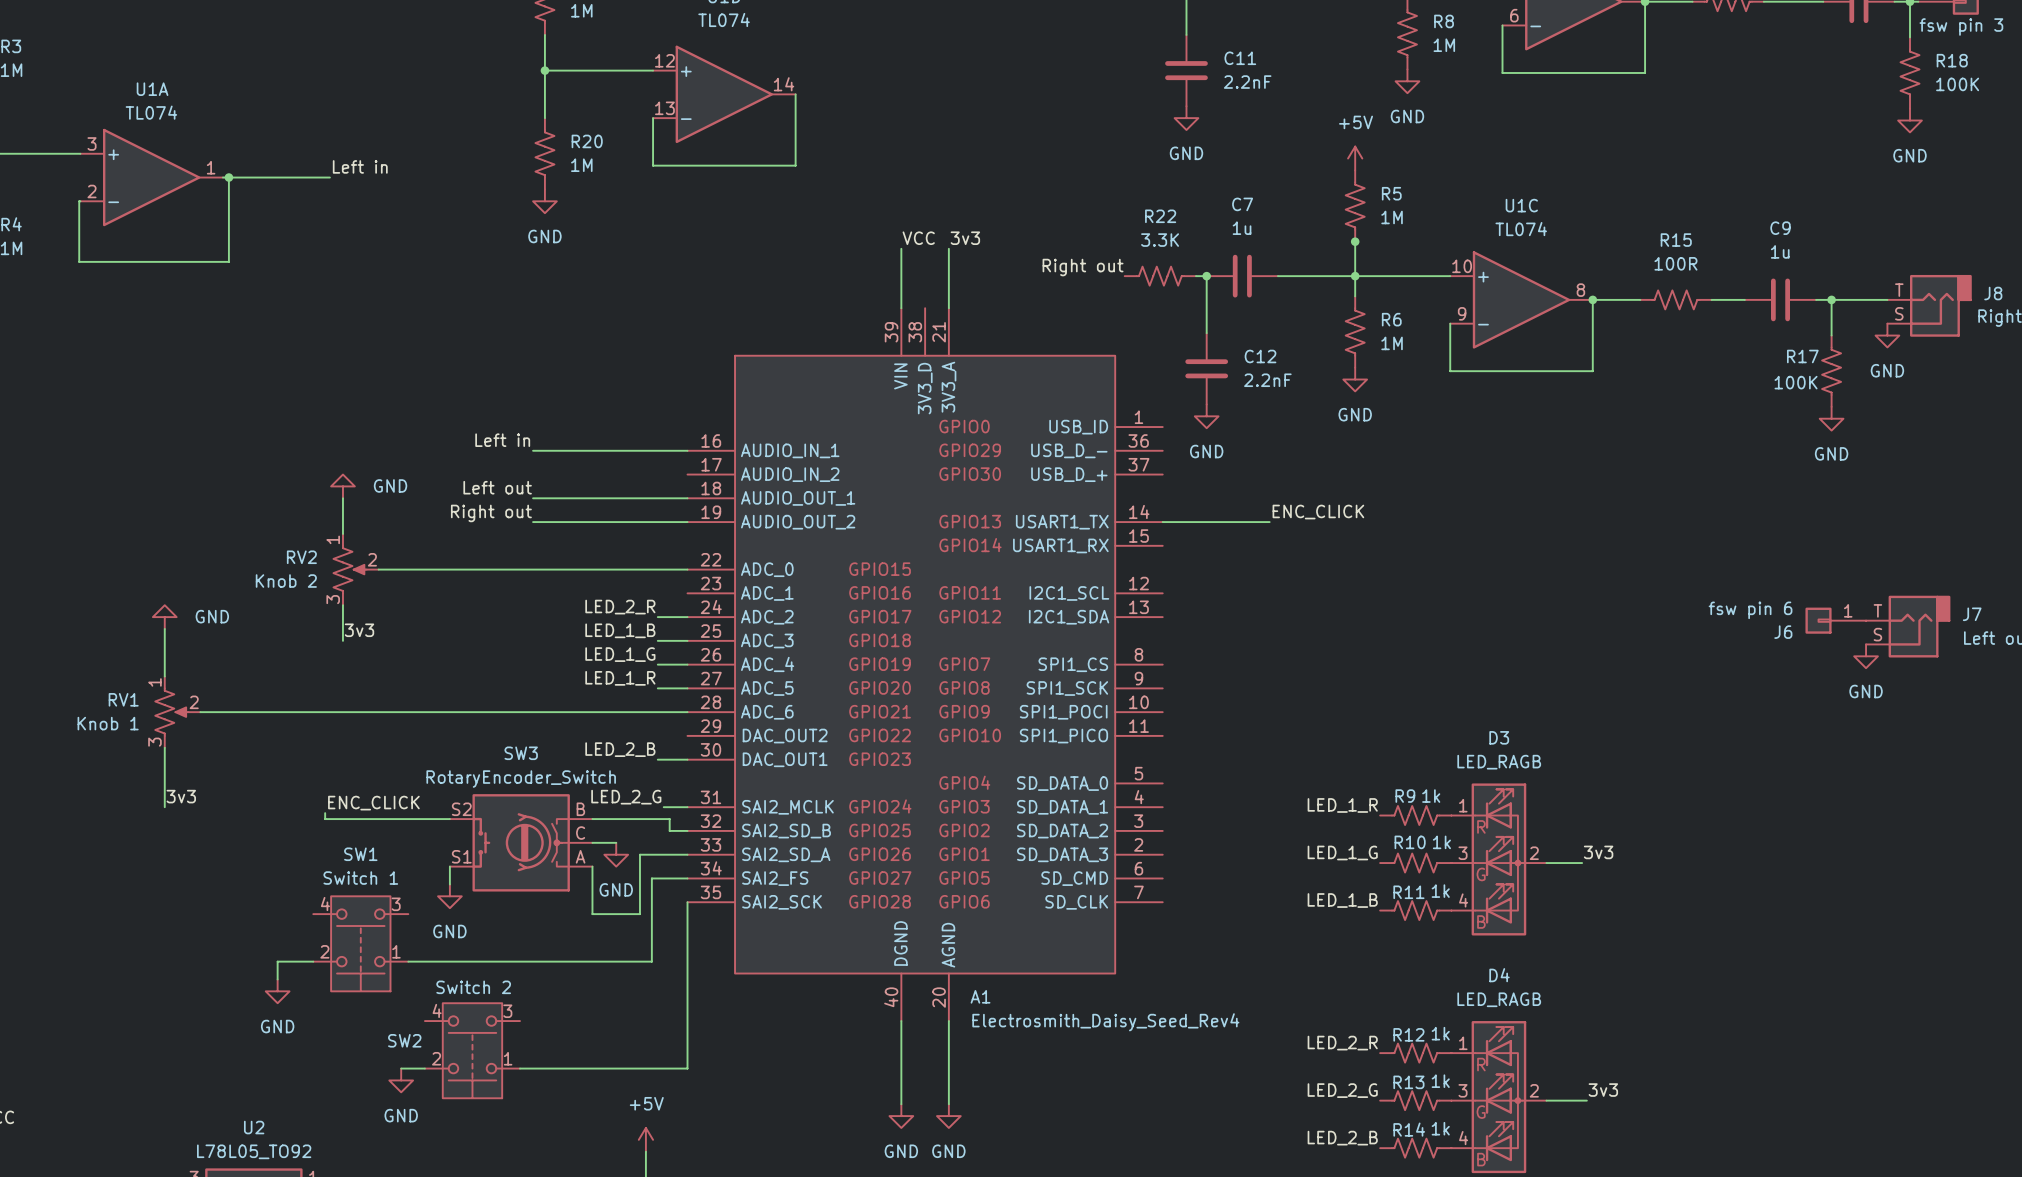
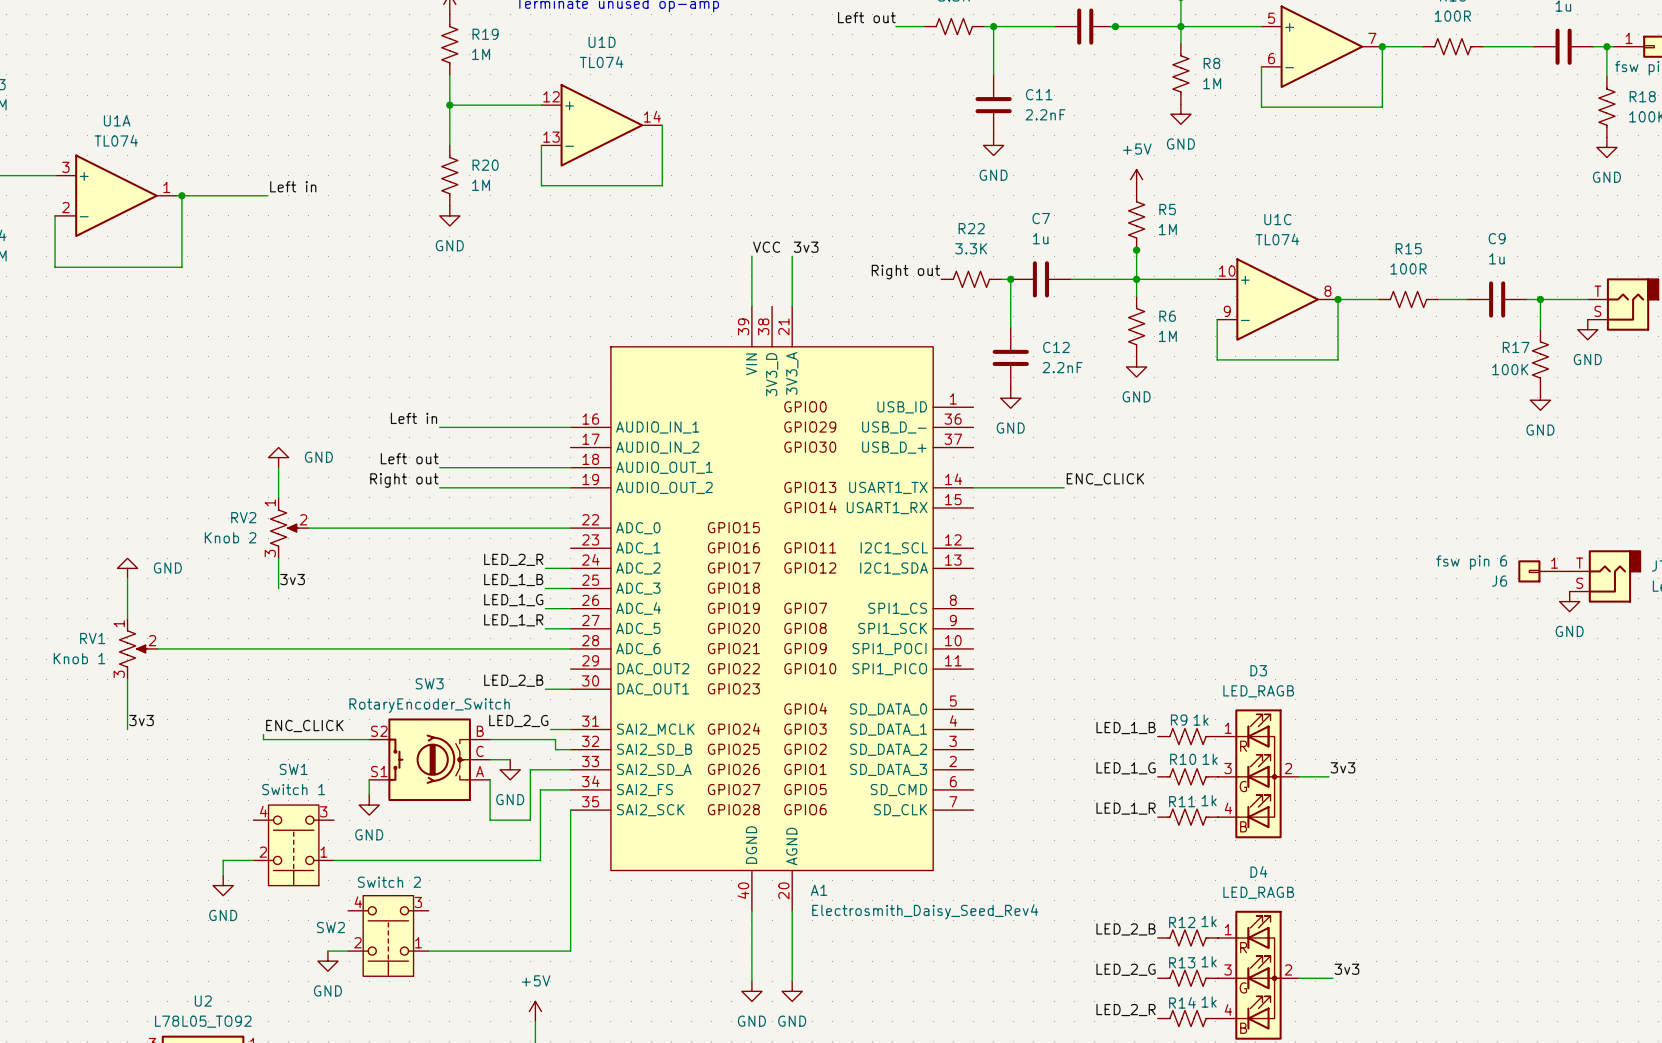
label: LED_1_R (1342, 805) -> LED_1_B (1126, 728)
label: LED_1_B (1342, 900) -> LED_1_R (1126, 808)
label: LED_2_R (1342, 1043) -> LED_2_B (1126, 929)
label: LED_2_B (1342, 1138) -> LED_2_R (1126, 1010)

